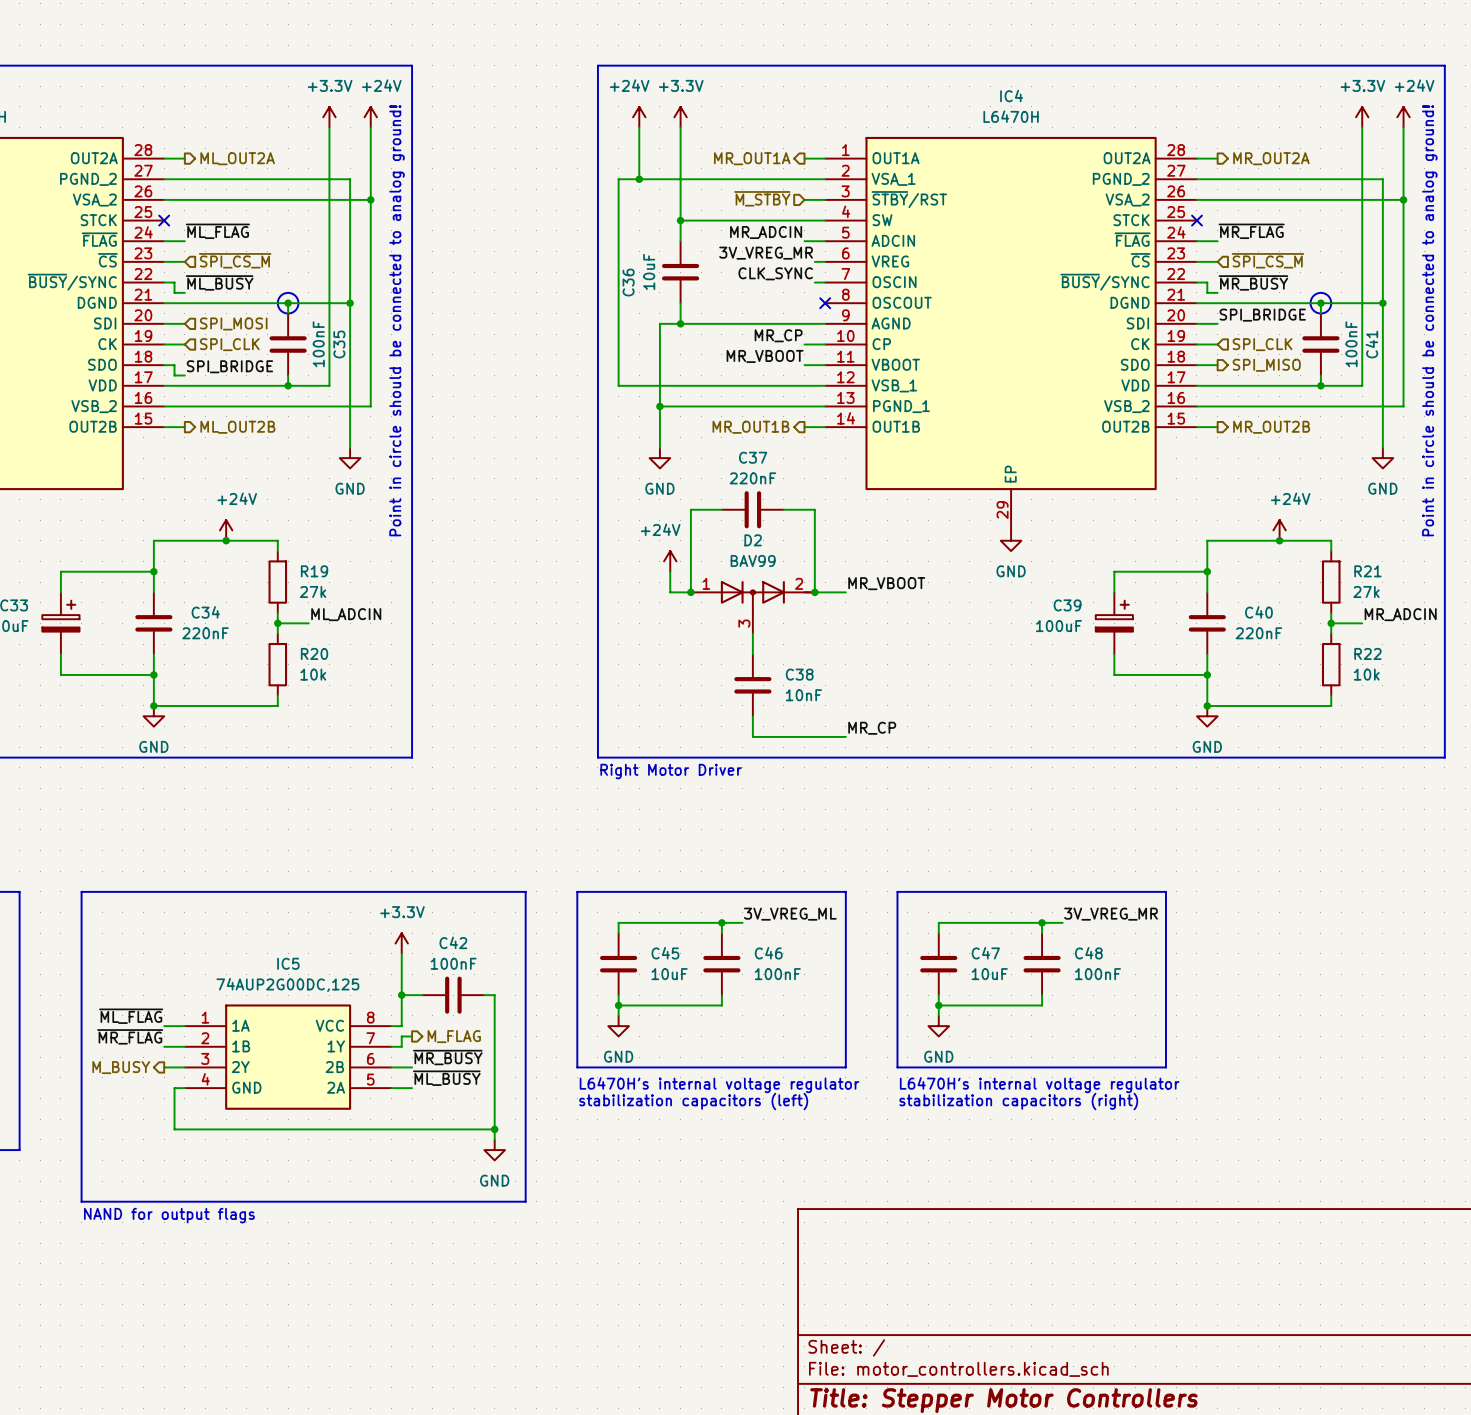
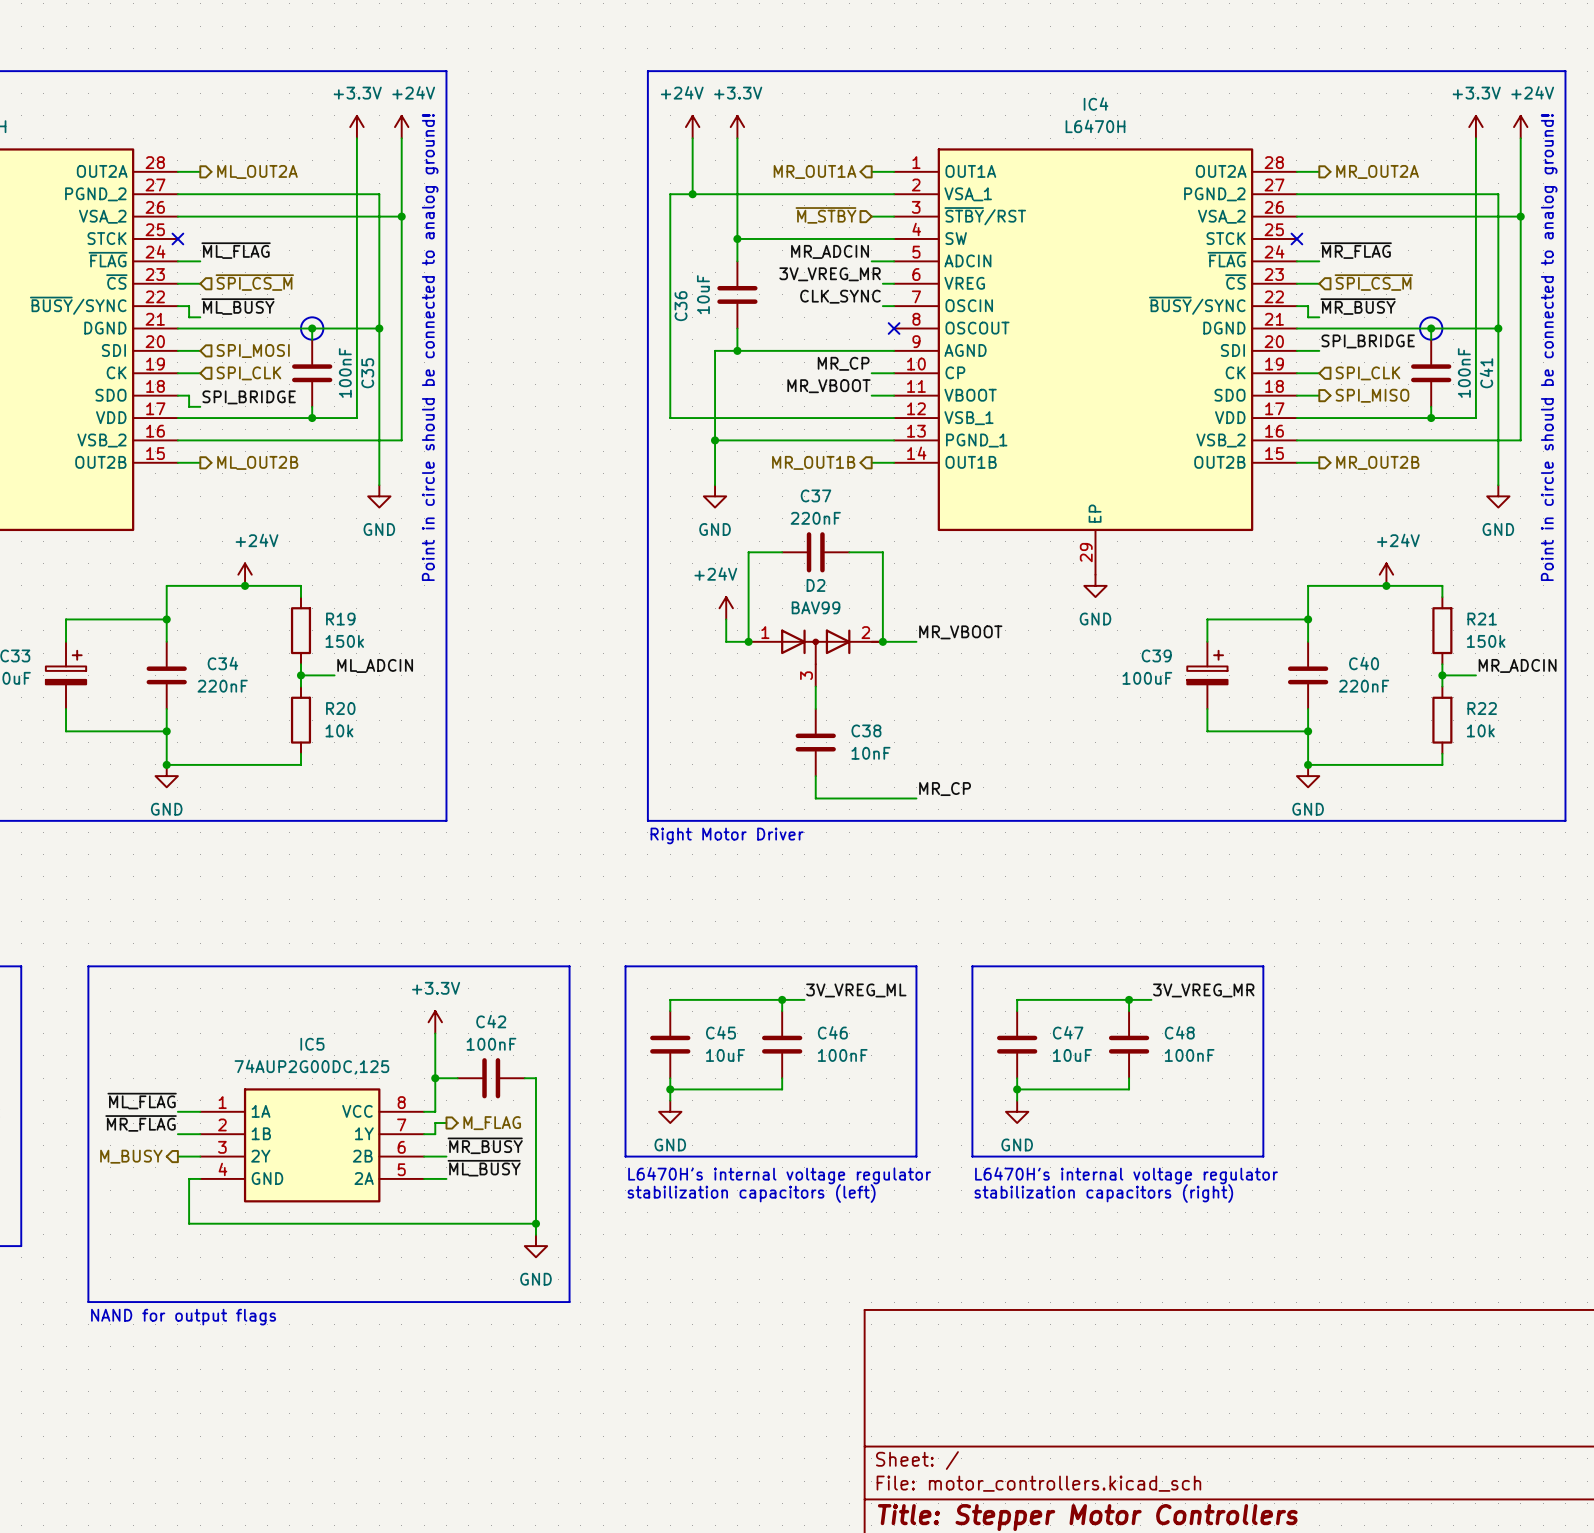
R19 value: 27k (313, 591) -> 150k (344, 641)
R21 value: 27k (1366, 591) -> 150k (1486, 641)

